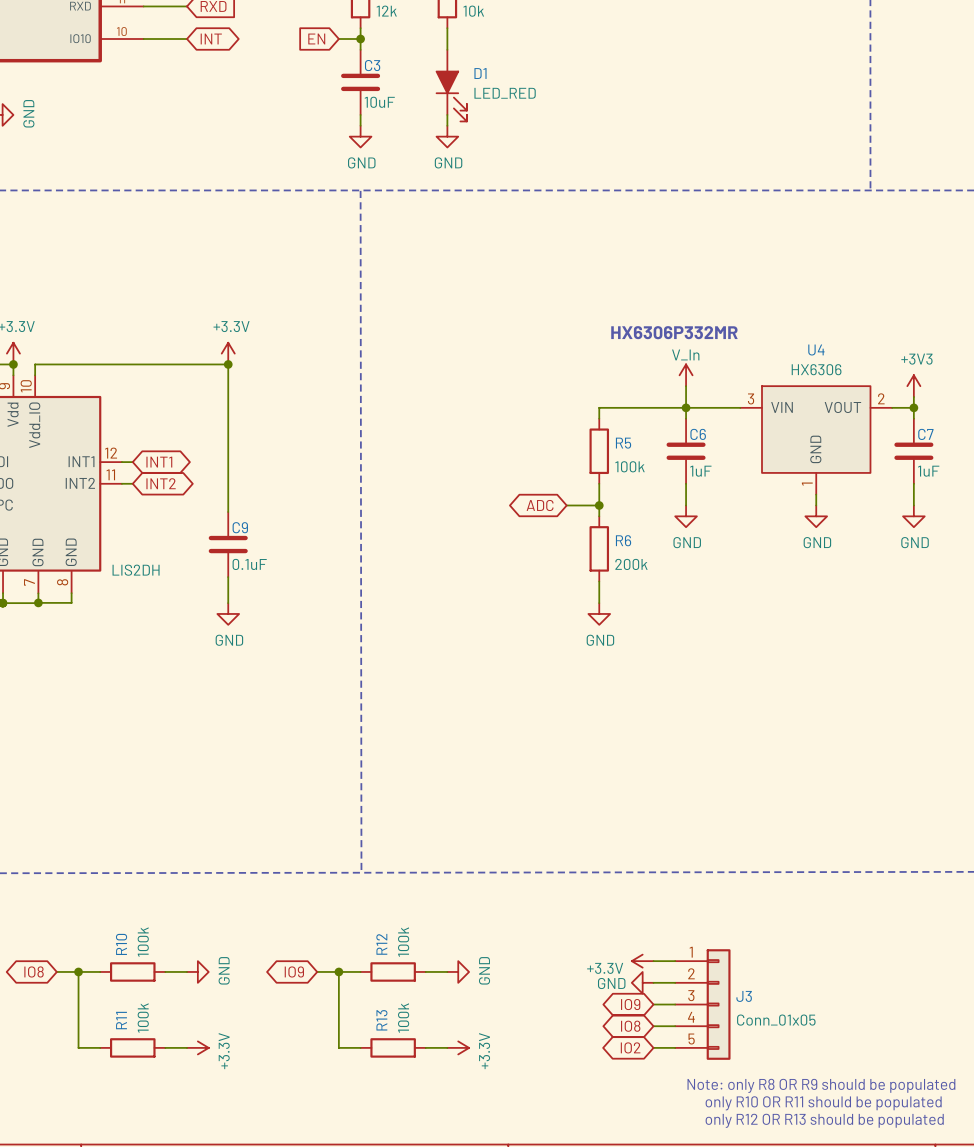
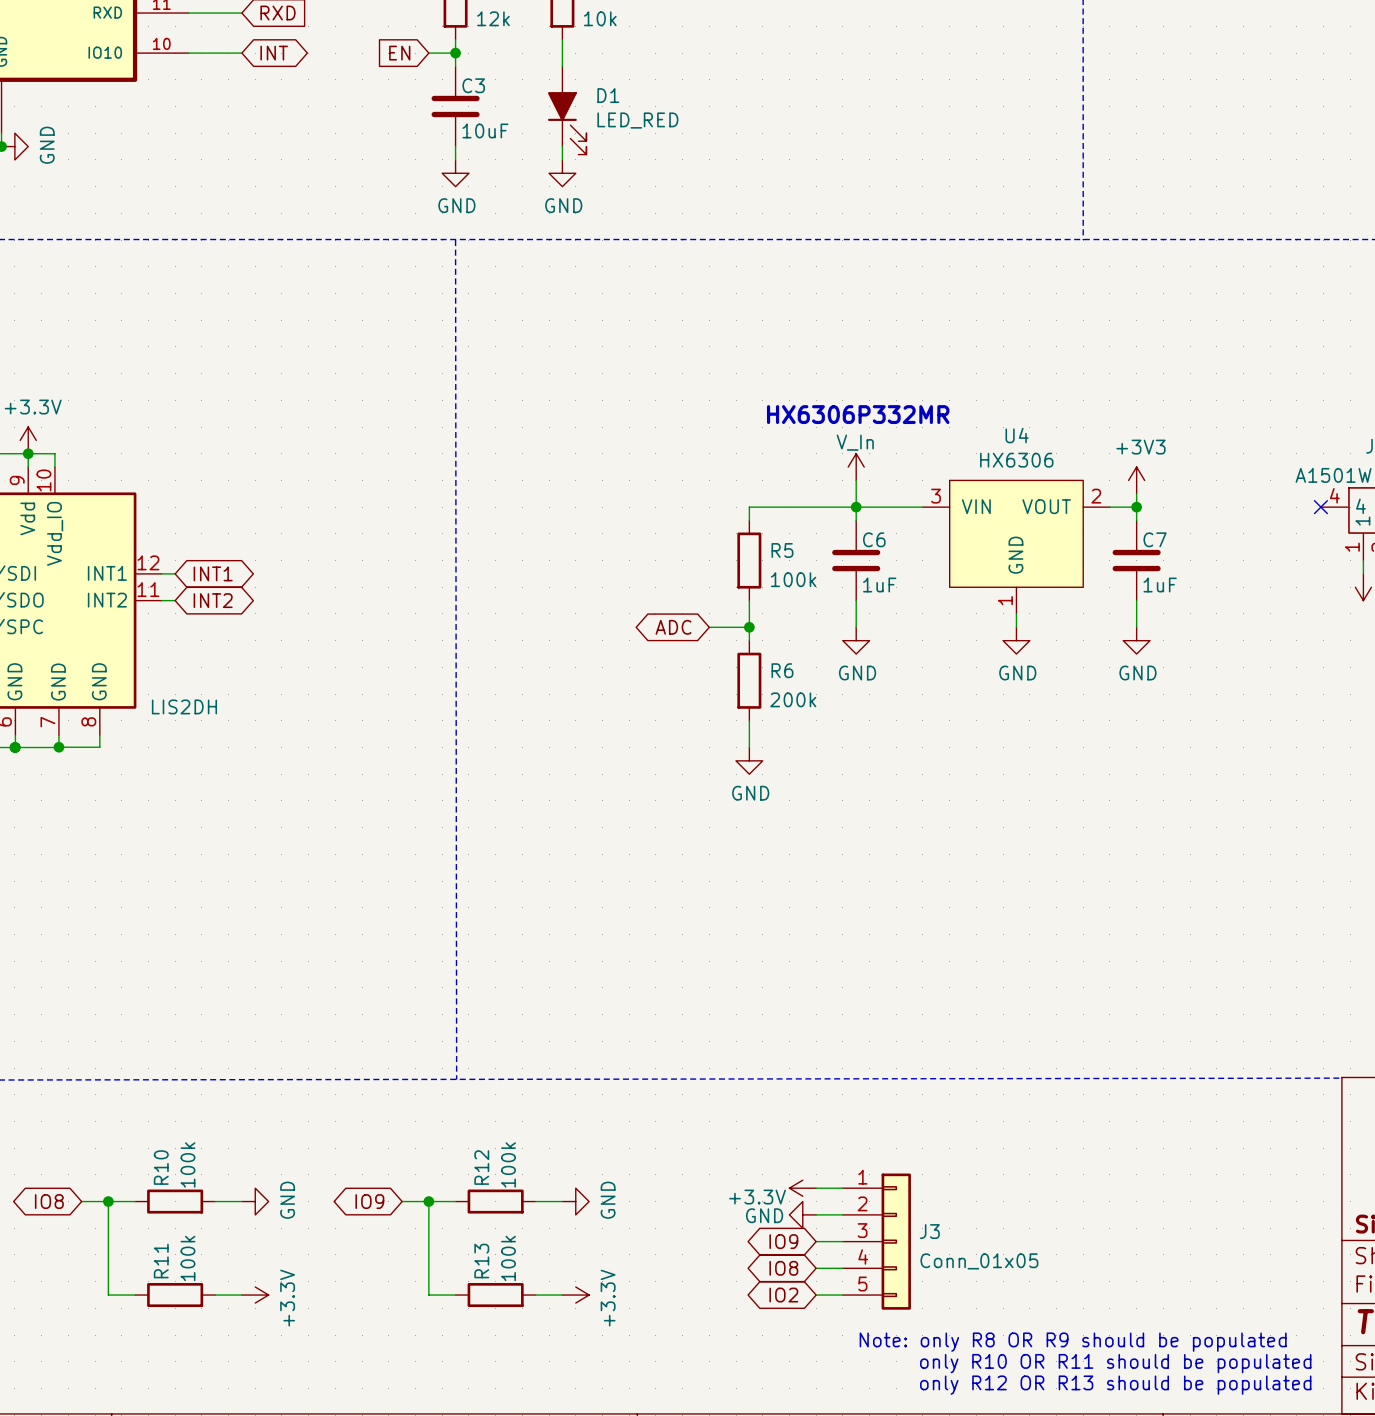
power symbol: +3.3V (228, 353) -> none
wire: (35, 364) (228, 364) (228, 512) -> (54, 453) (28, 453)
junction: (228, 364) -> none
C9: 0.1uF (228, 544) -> none
wire: (228, 577) (228, 603) -> none
power symbol: GND (228, 613) -> none

